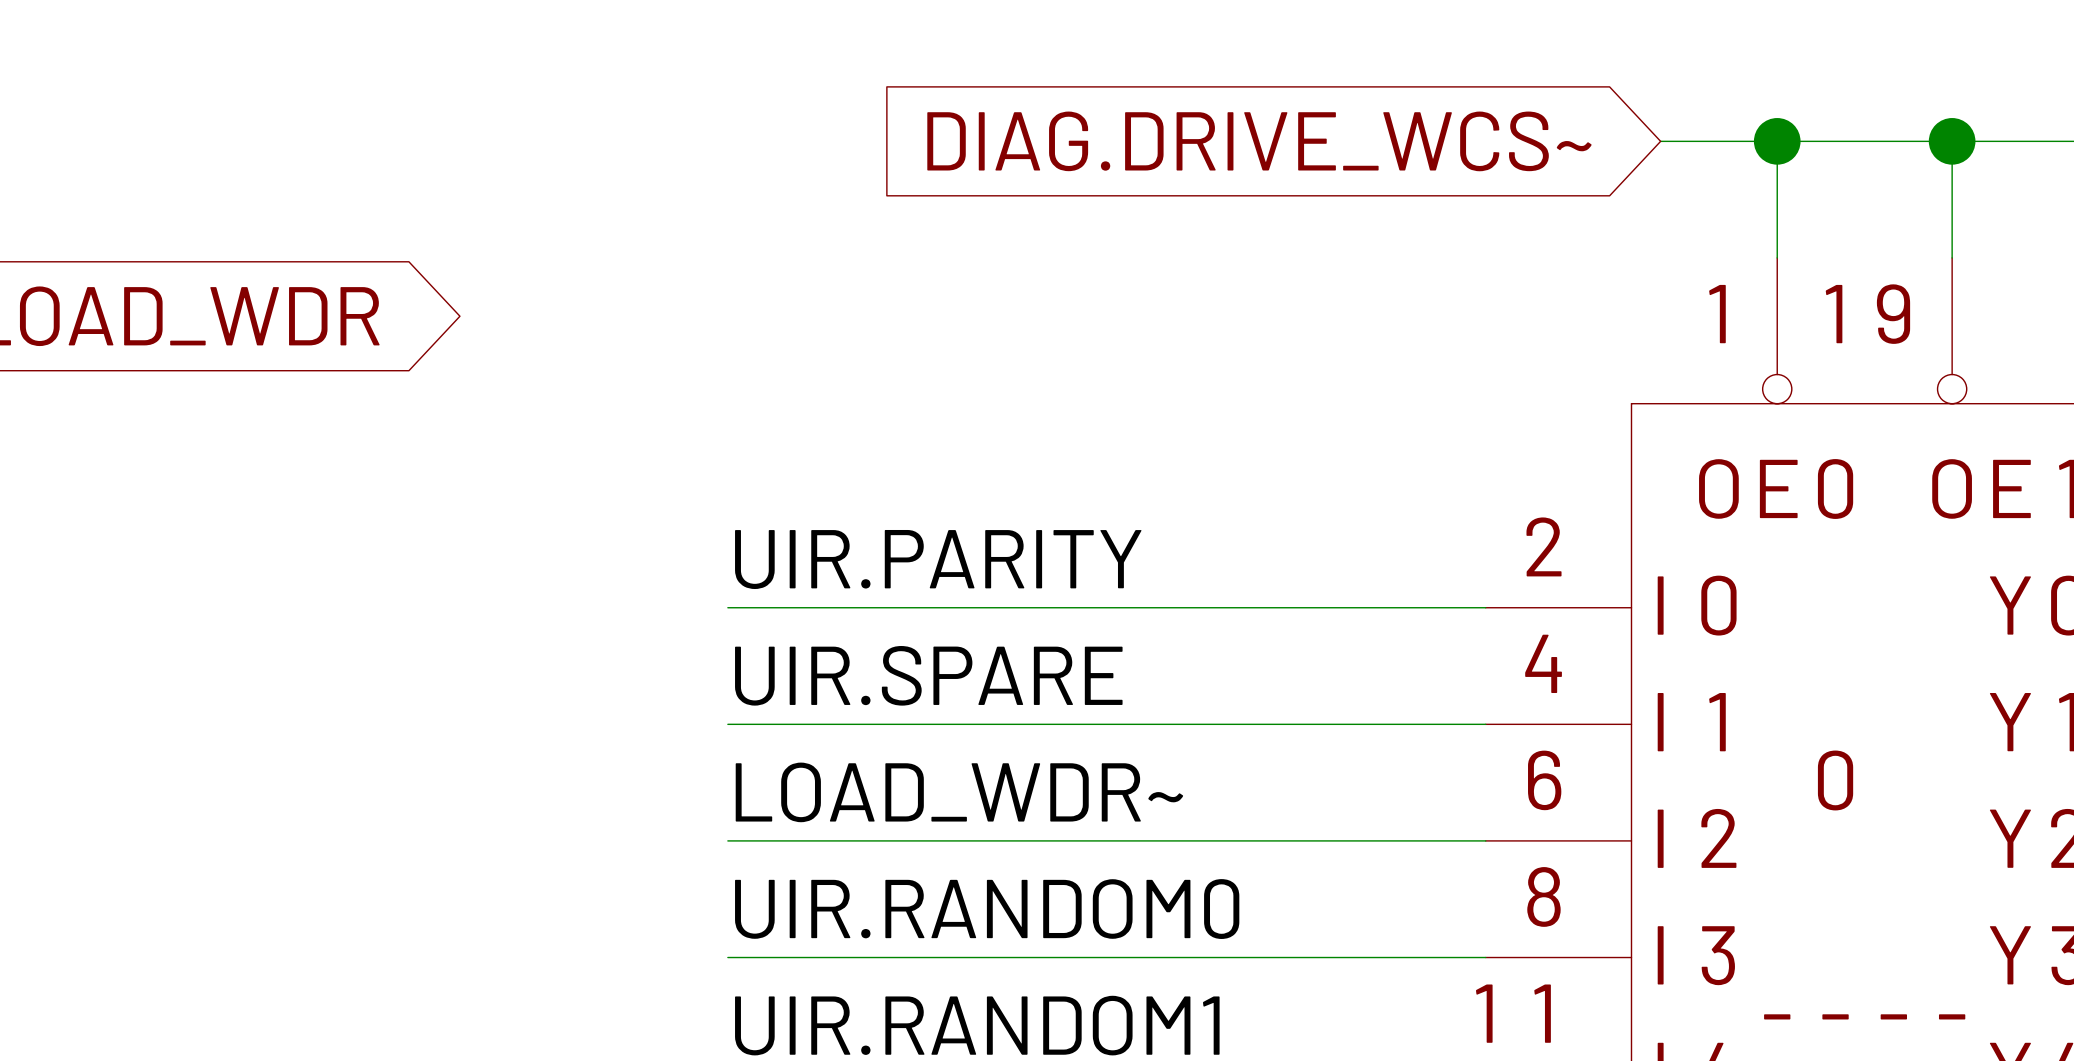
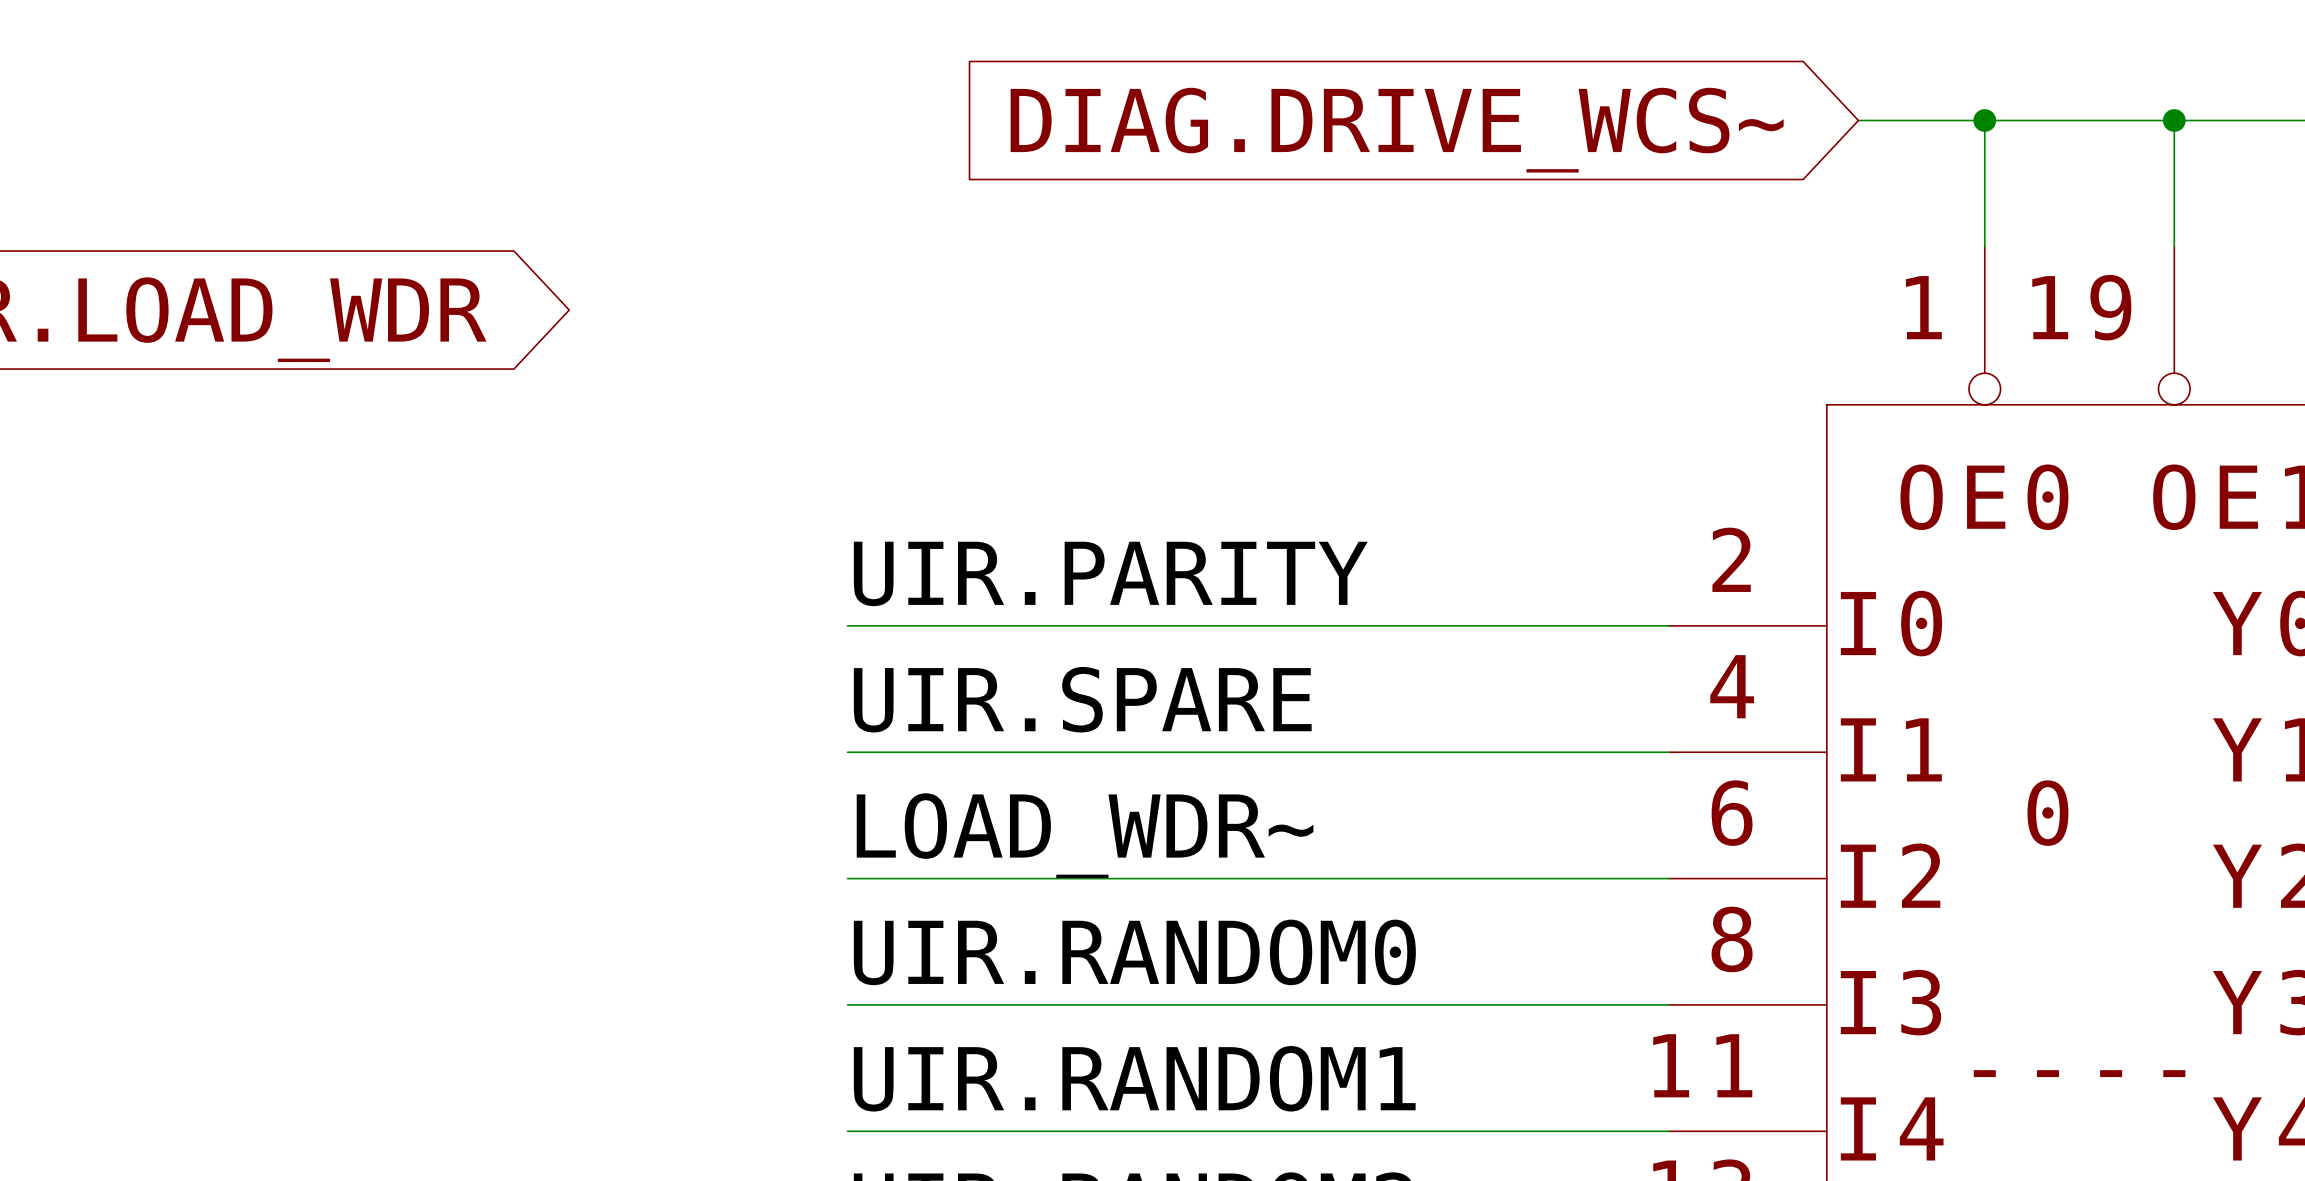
junction size: [1753, 118, 1801, 165] -> [1973, 109, 1997, 132]
junction size: [1928, 118, 1976, 165] -> [2162, 109, 2186, 132]

